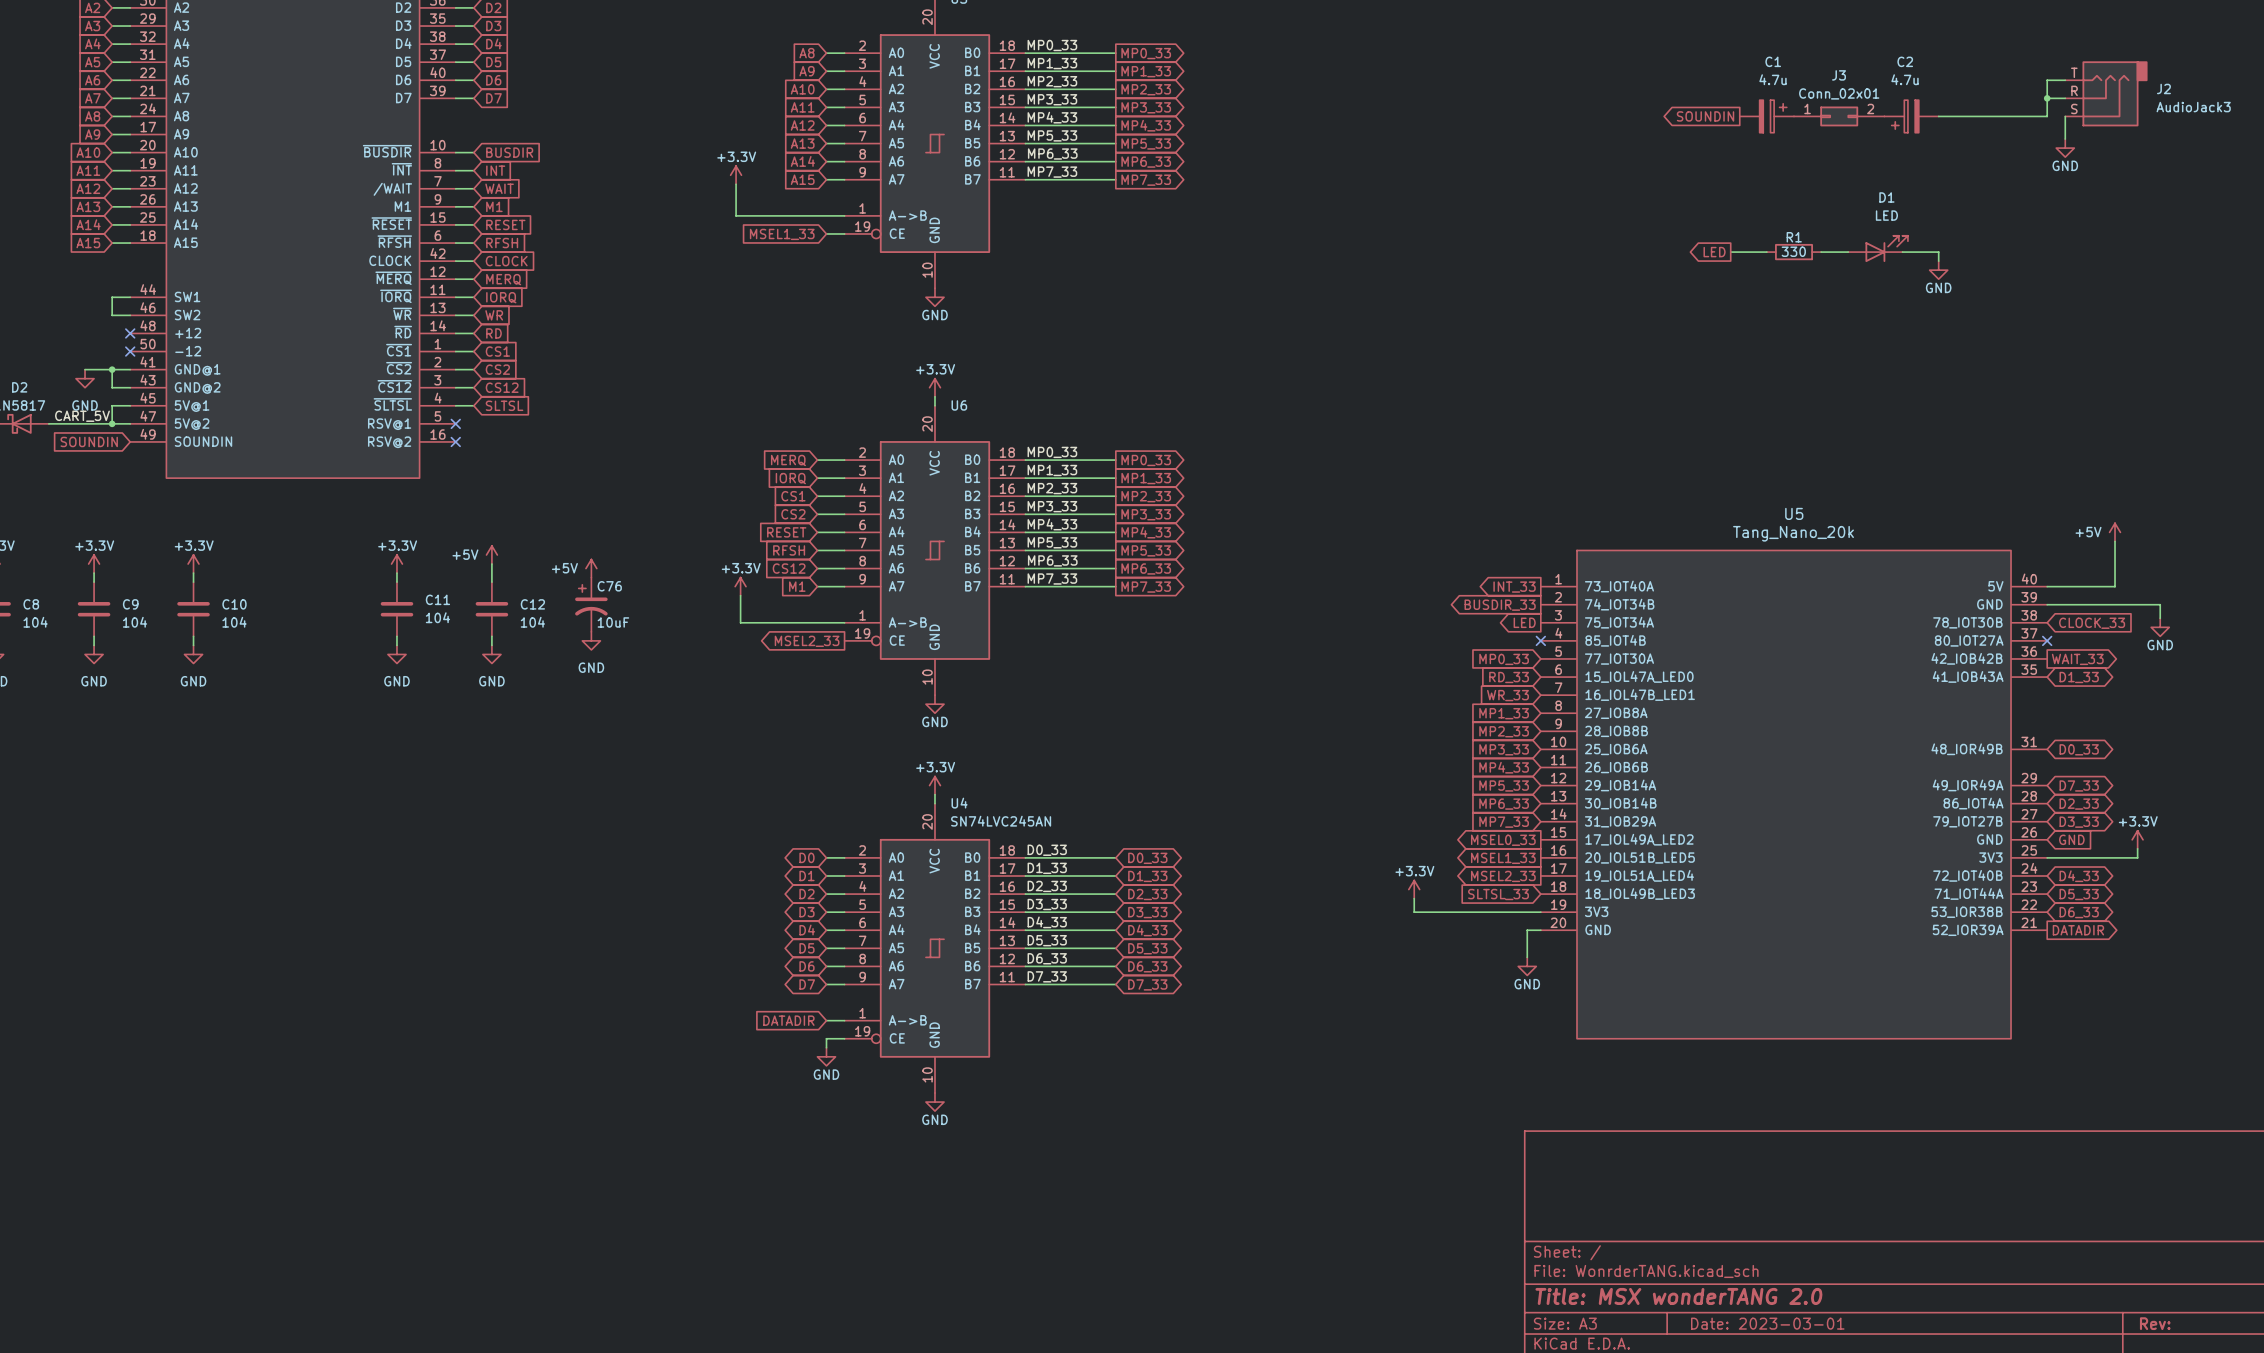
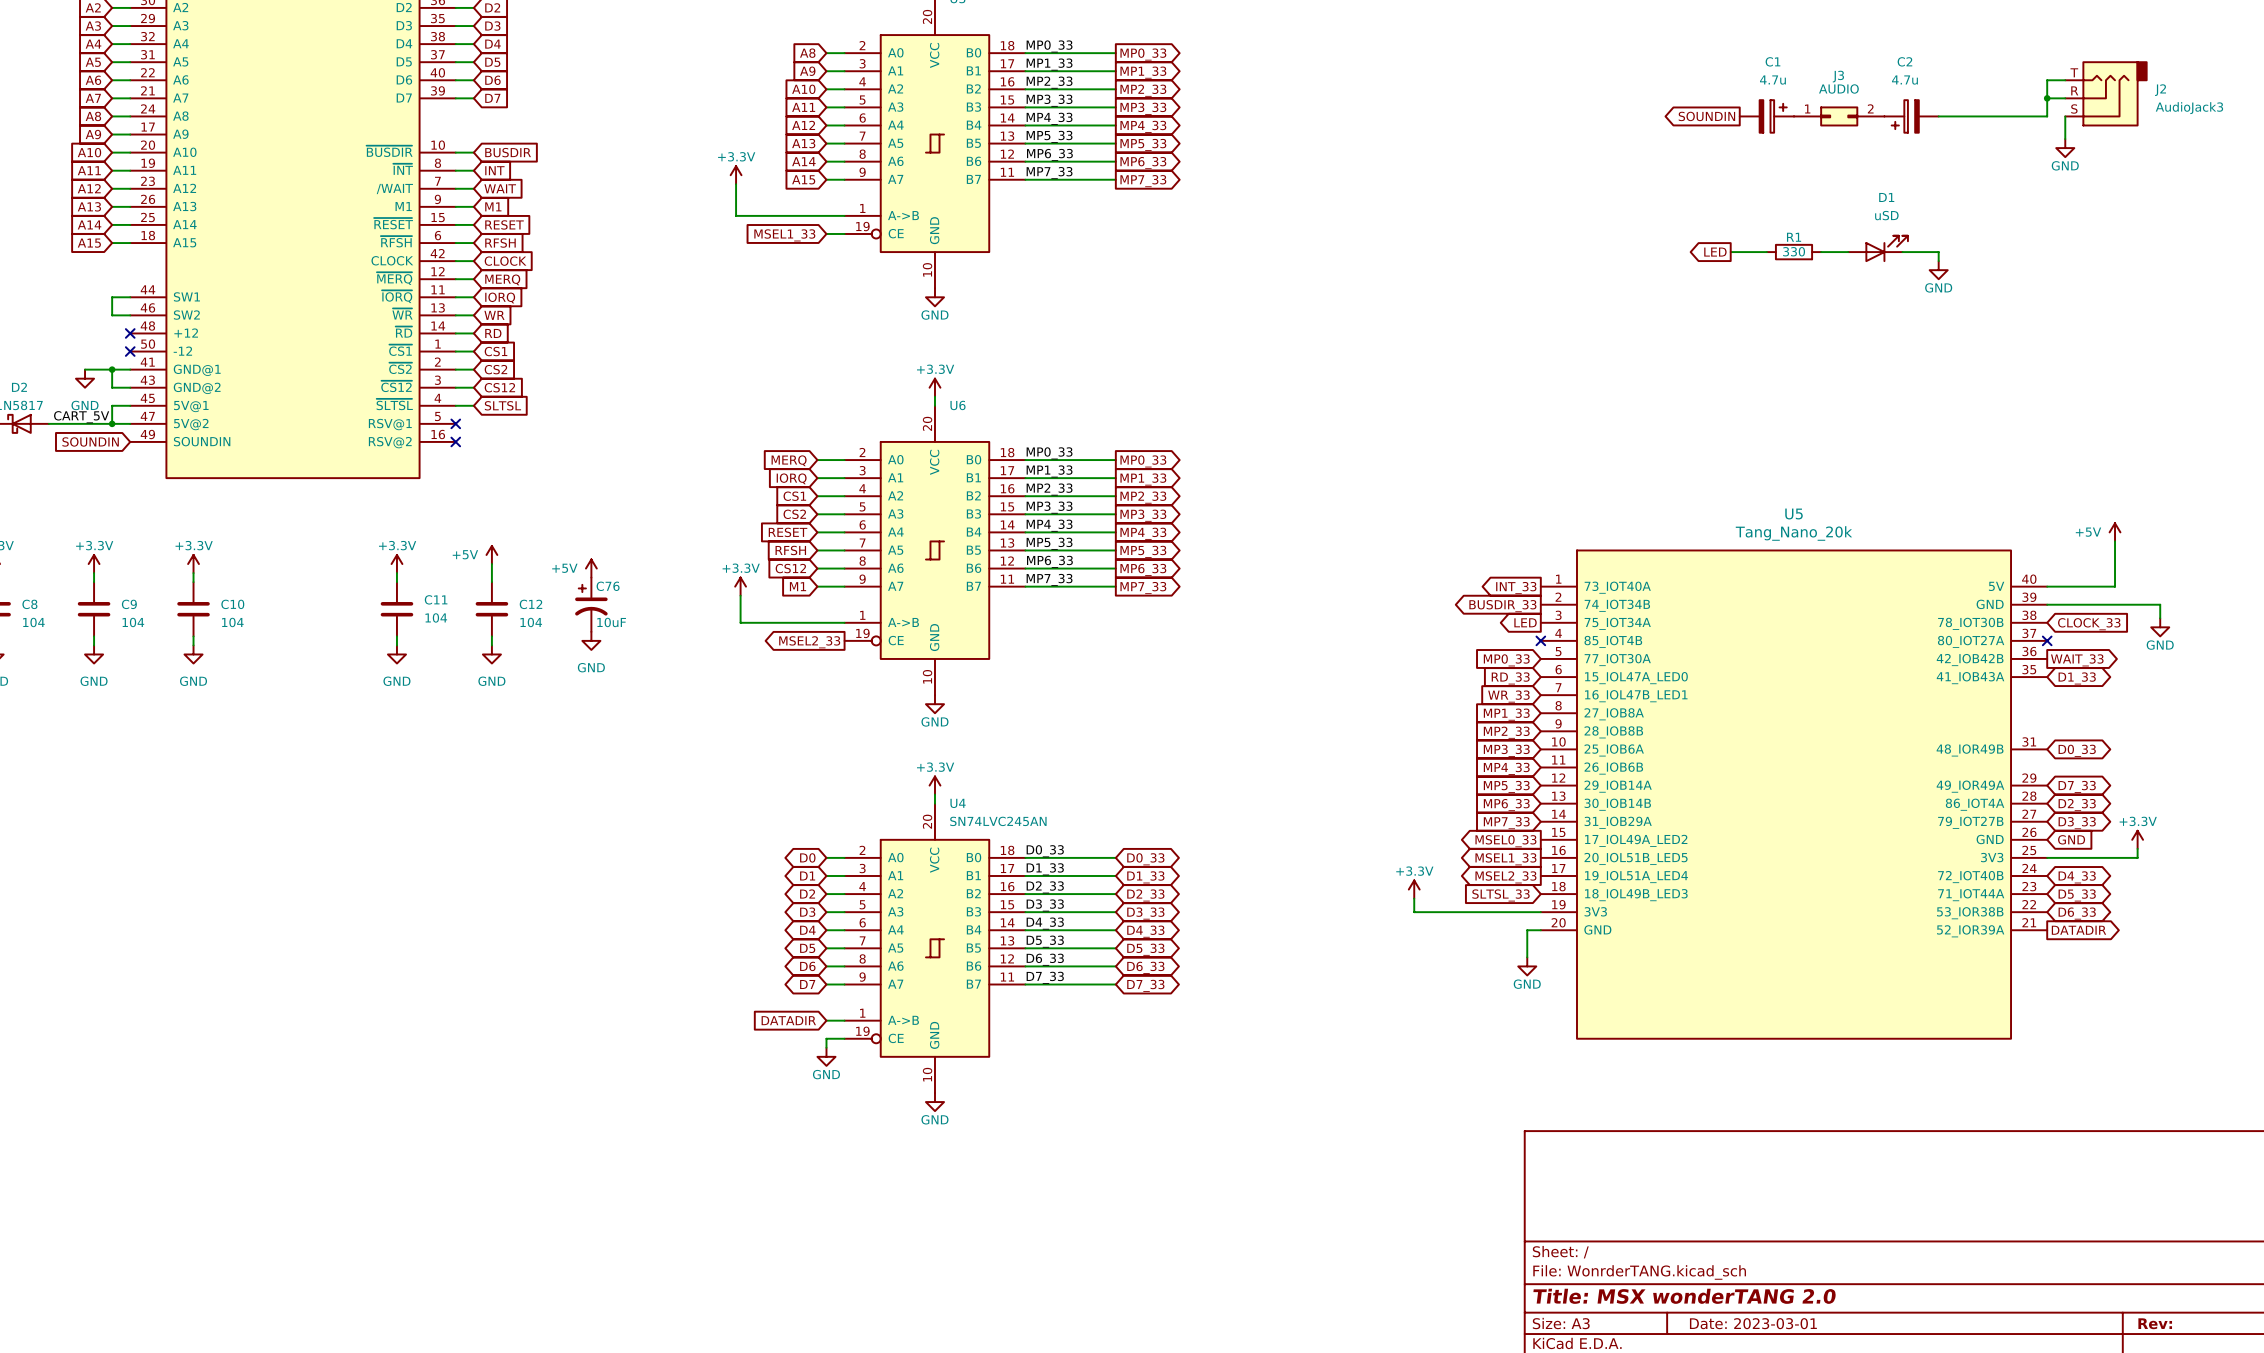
J3 value: Conn_02x01 (1839, 93) -> AUDIO (1838, 88)
D1 value: LED (1886, 215) -> uSD (1886, 215)

